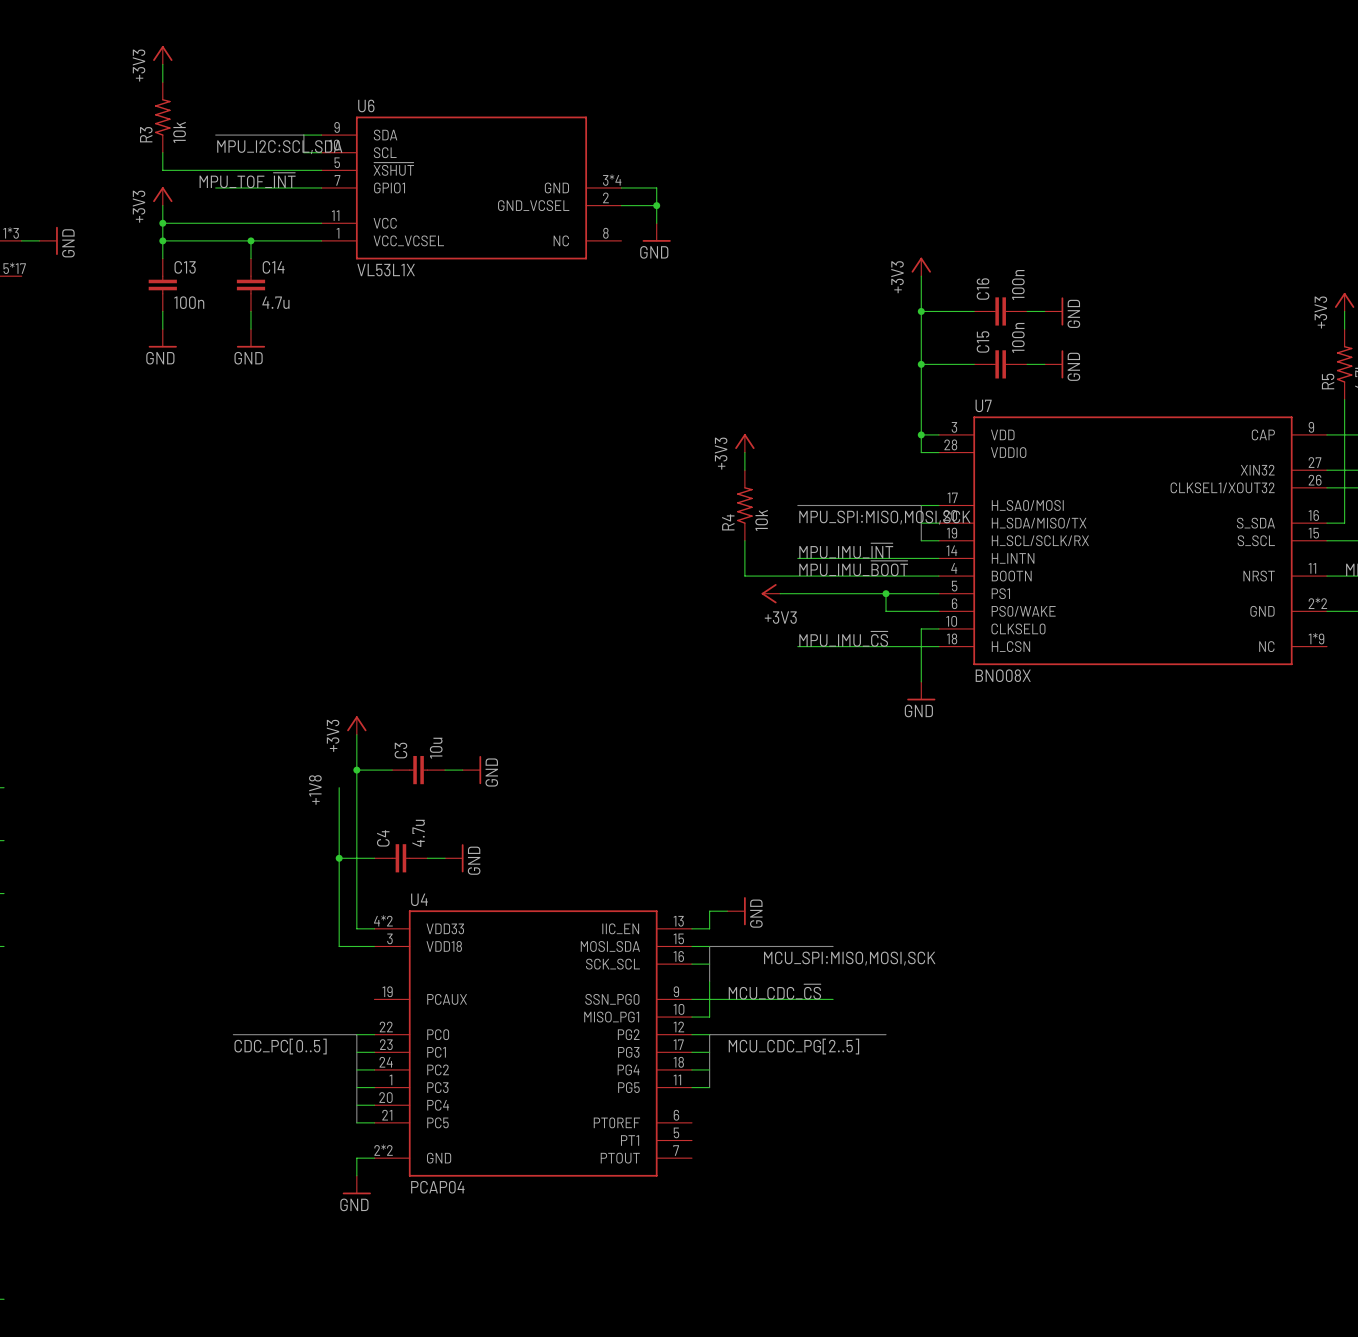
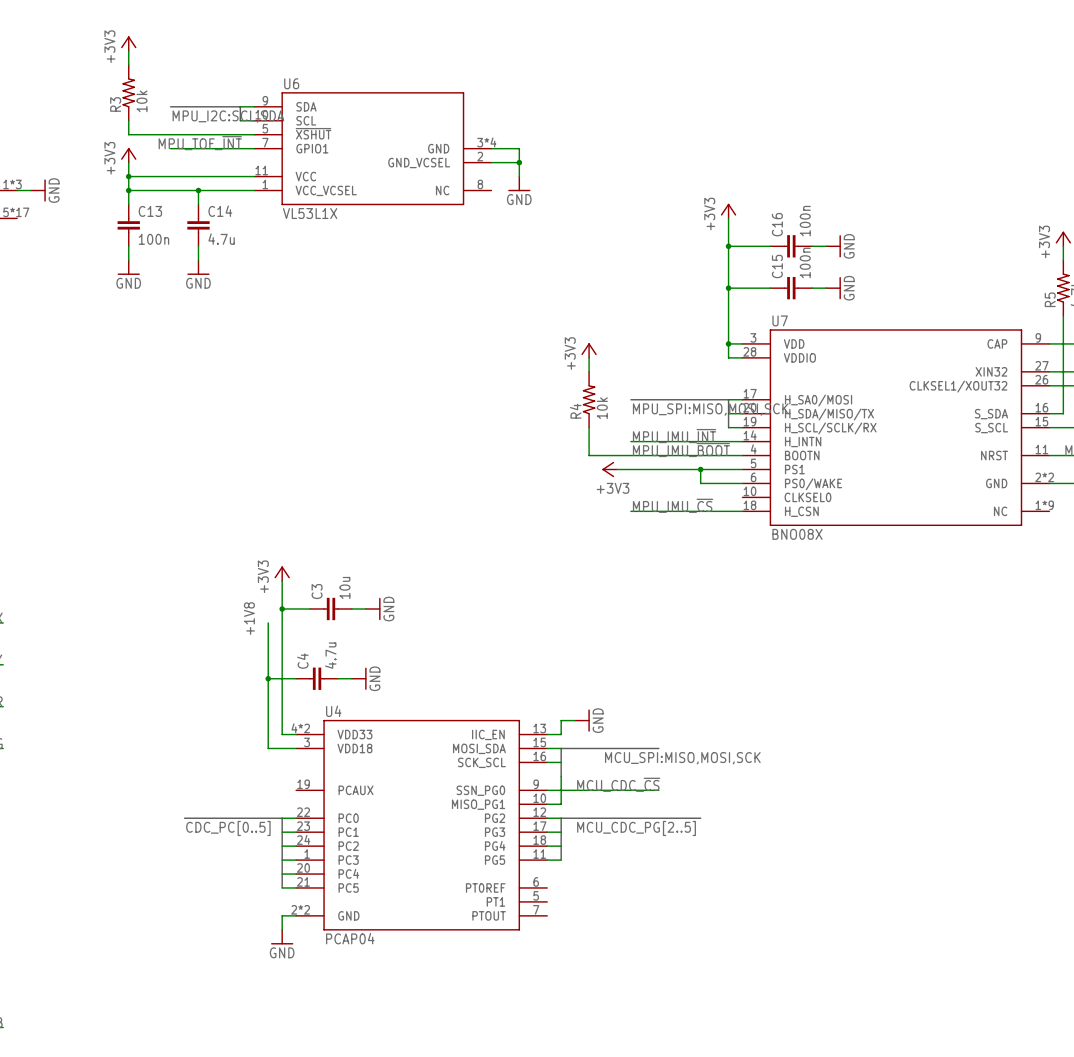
wire: (938, 628) (921, 628) (921, 681) -> none
power symbol: GND (921, 691) -> none

